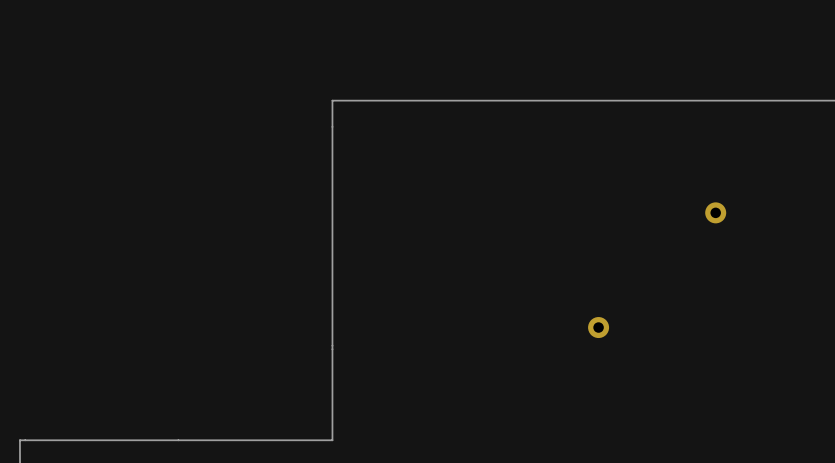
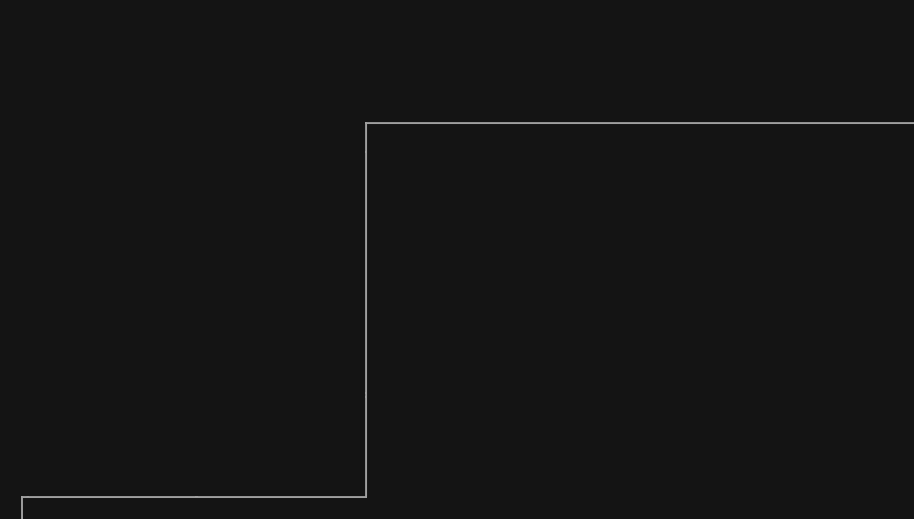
via: (715, 212) -> none
via: (598, 327) -> none

